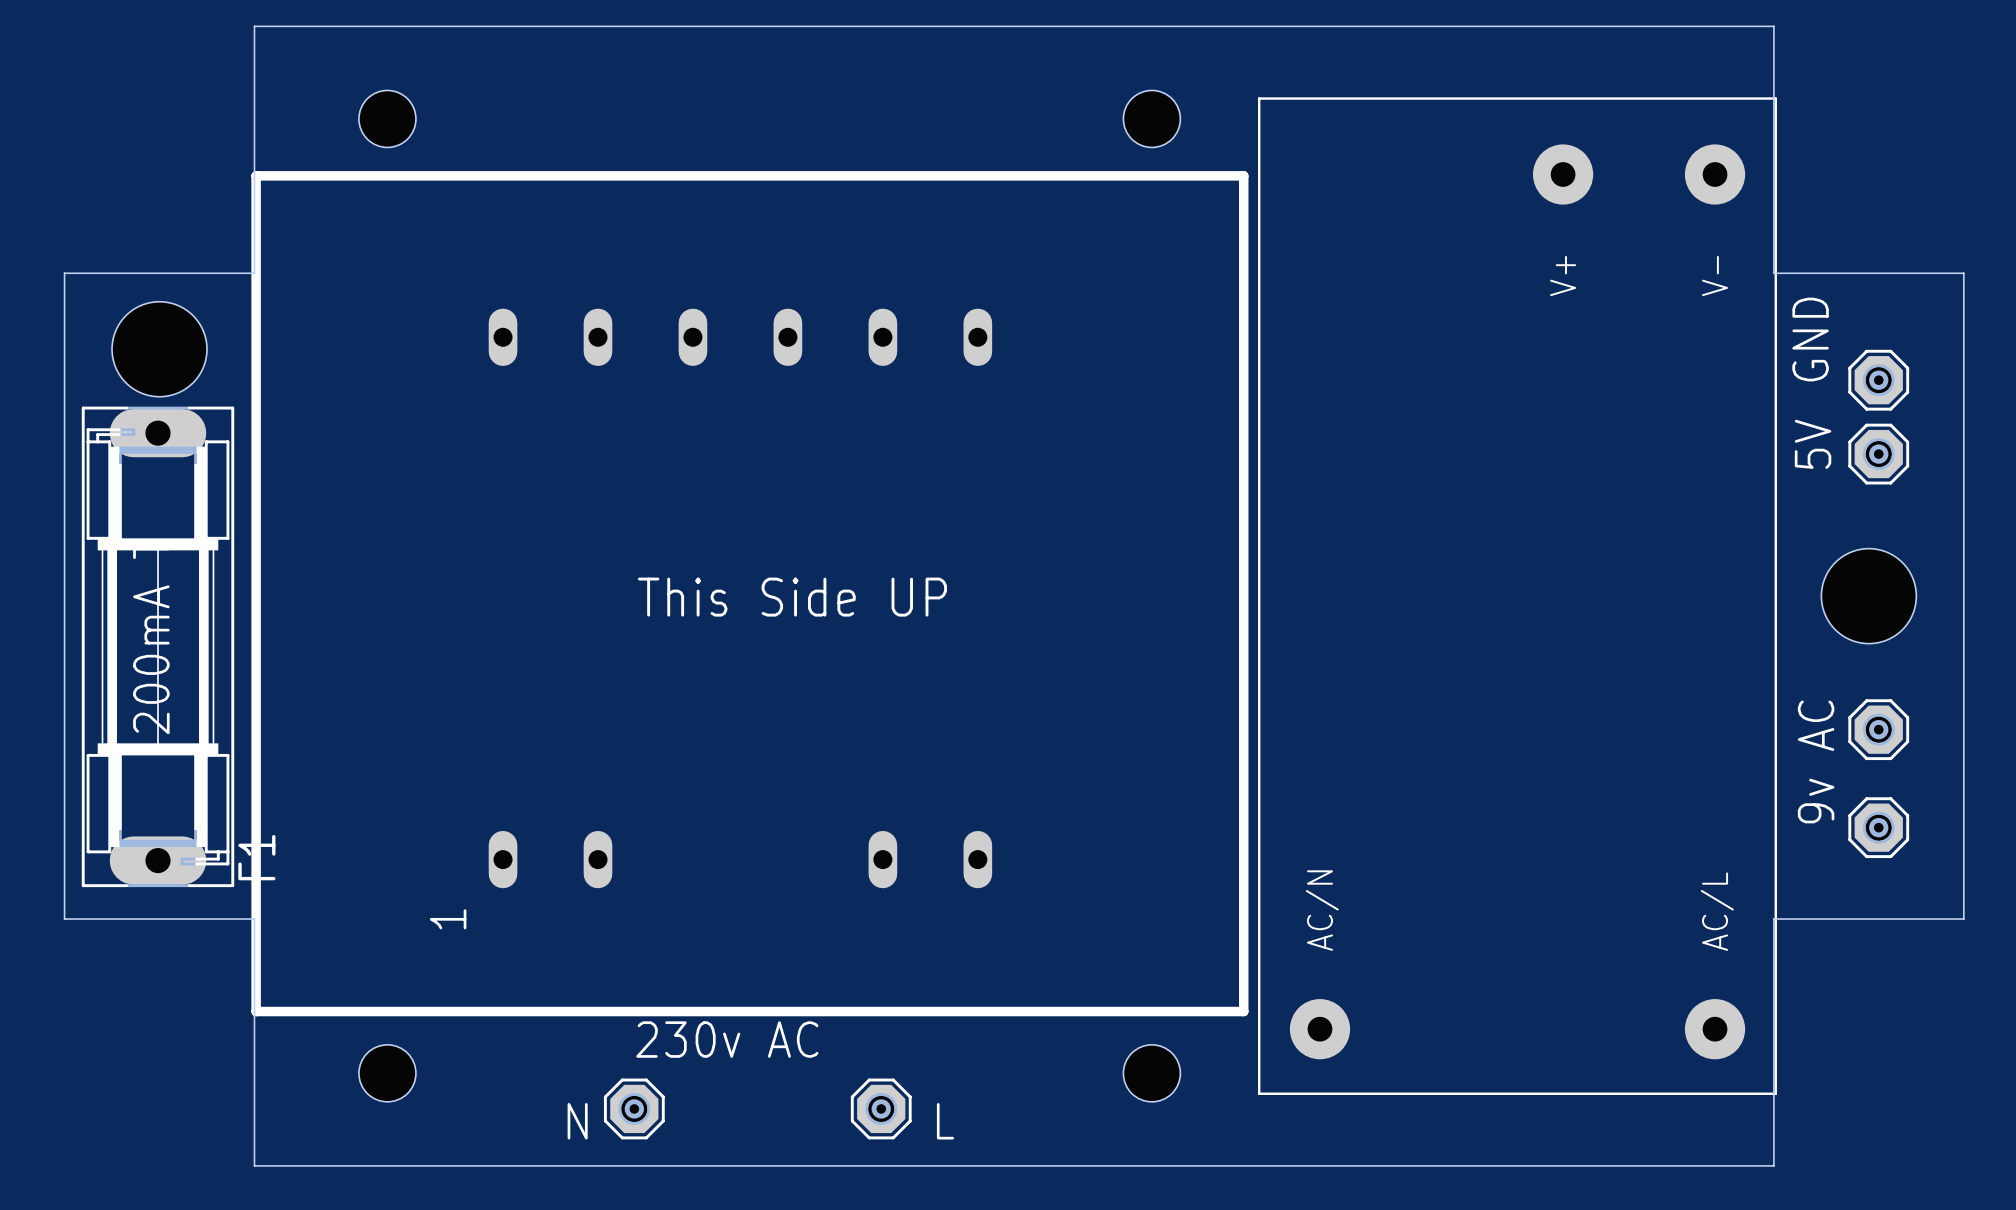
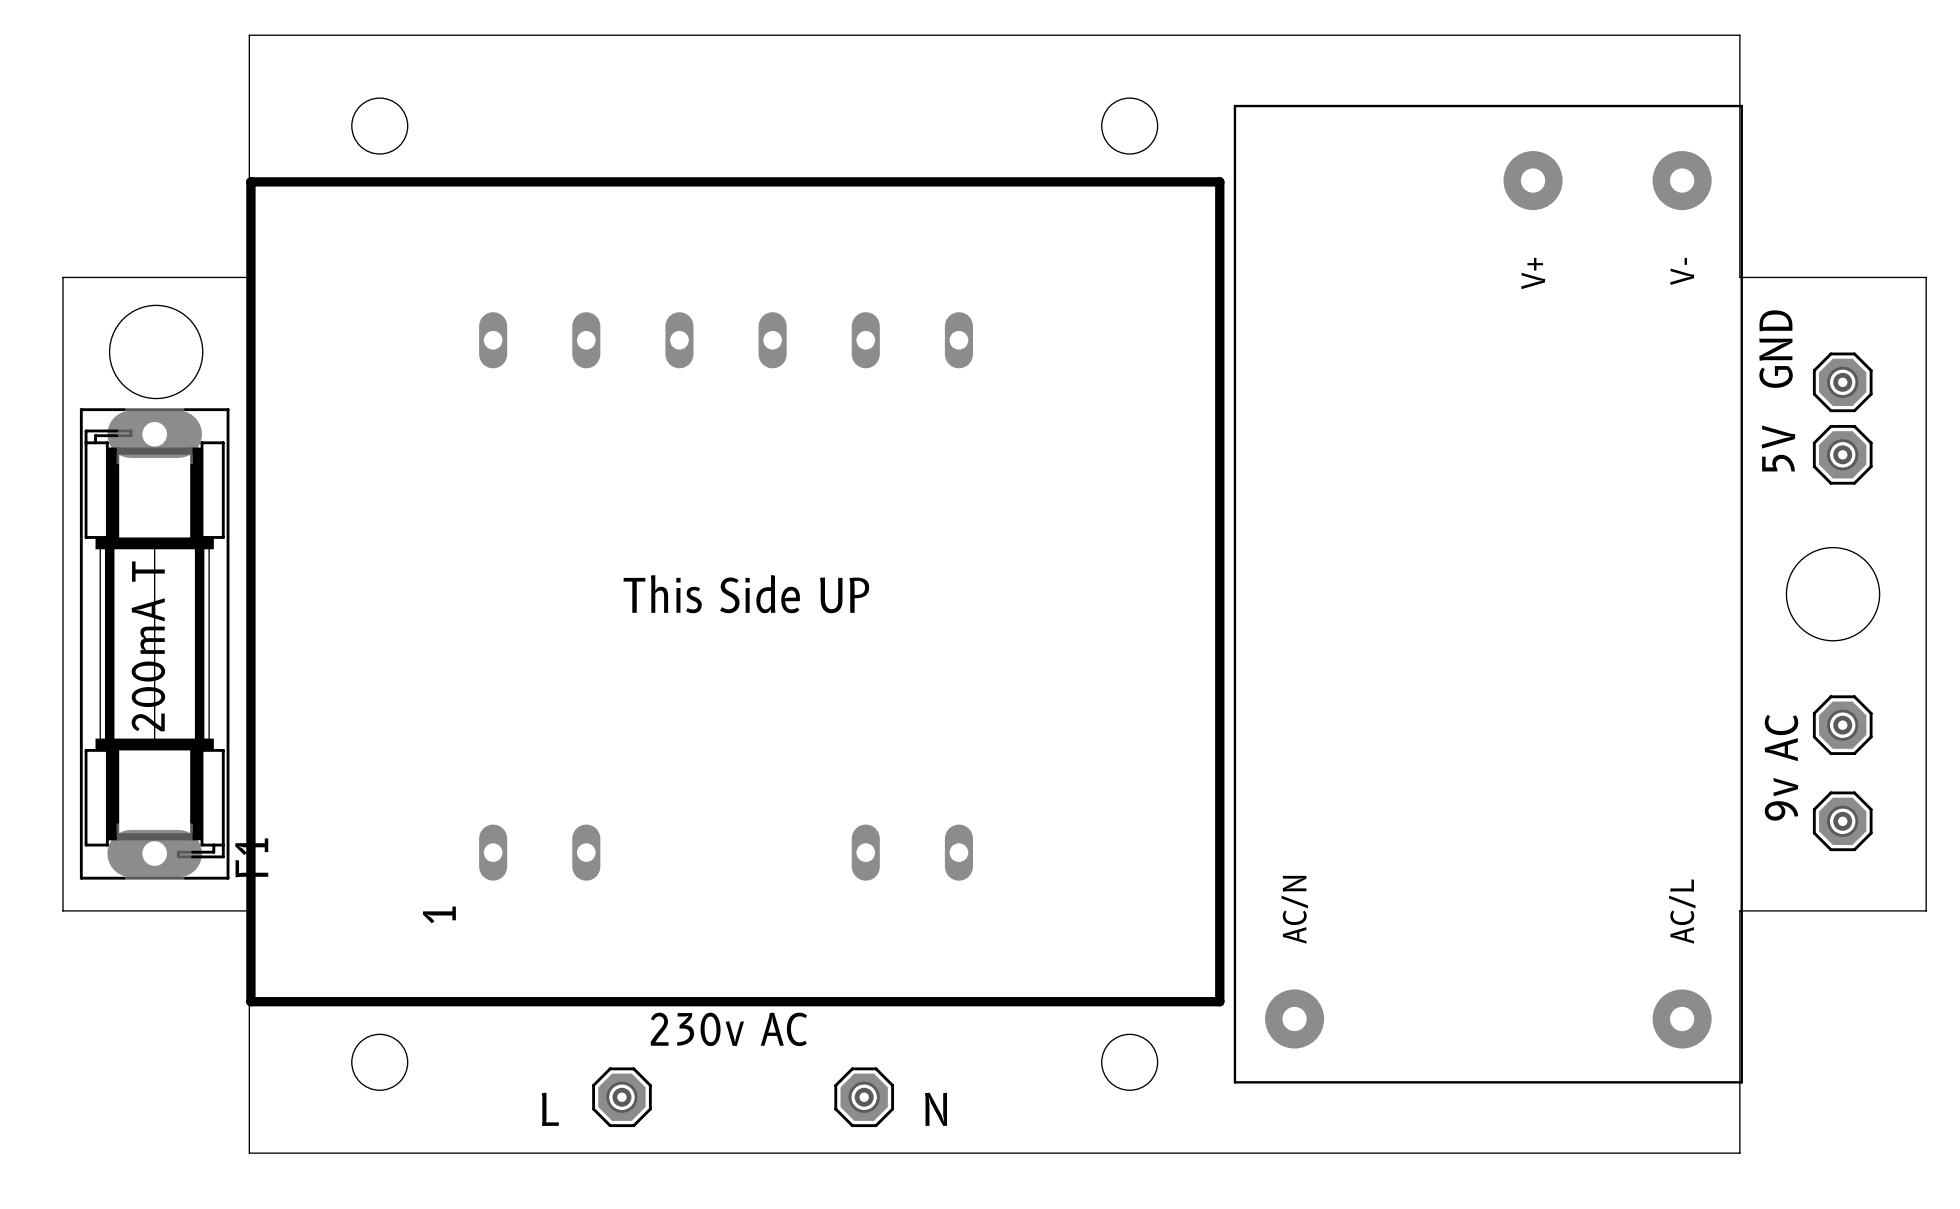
text position: N (577, 1121) -> N (935, 1109)
text position: L (945, 1121) -> L (550, 1109)

